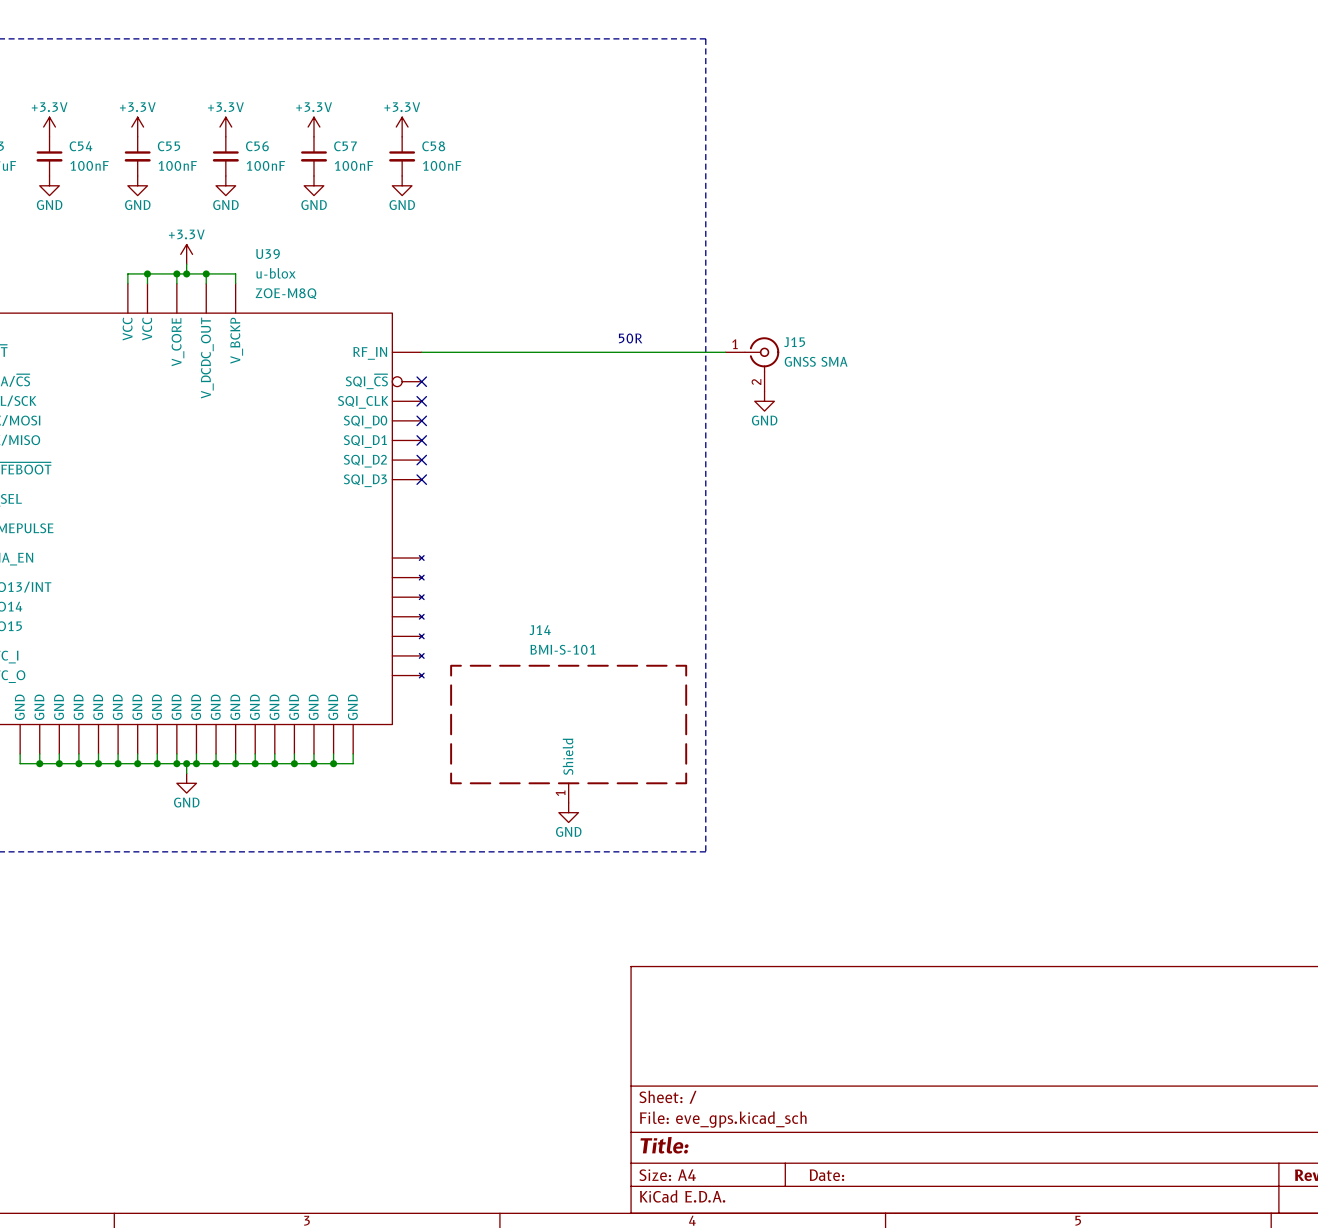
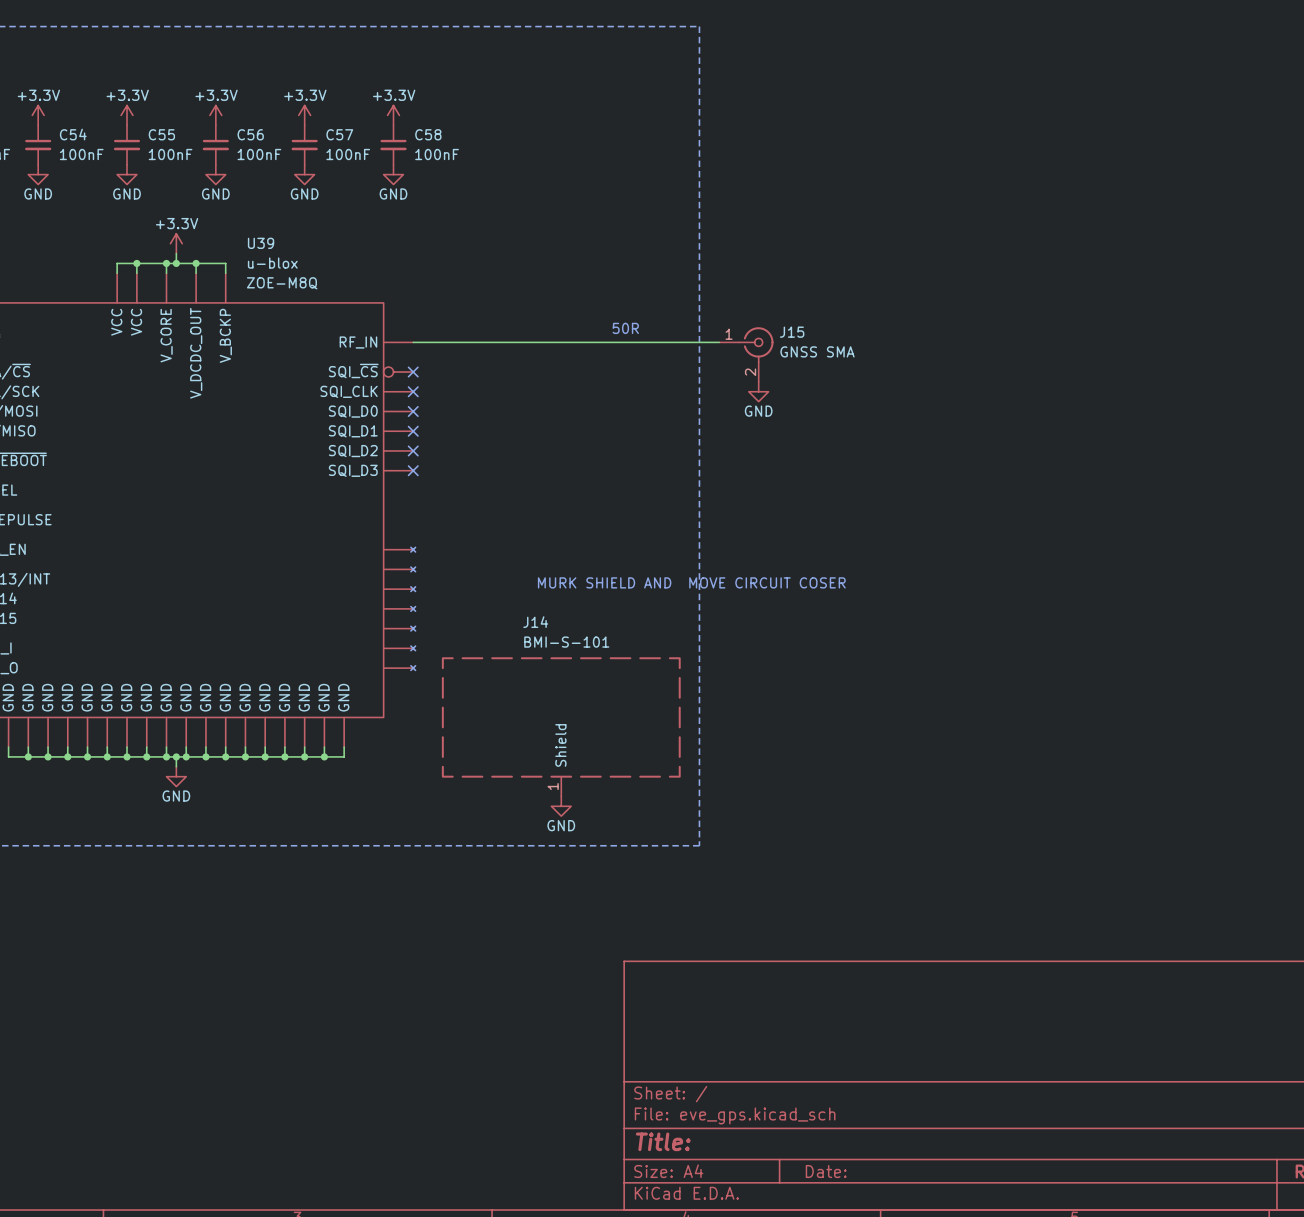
text: none -> MURK SHIELD AND MOVE CIRCUIT COSER (691, 582)

